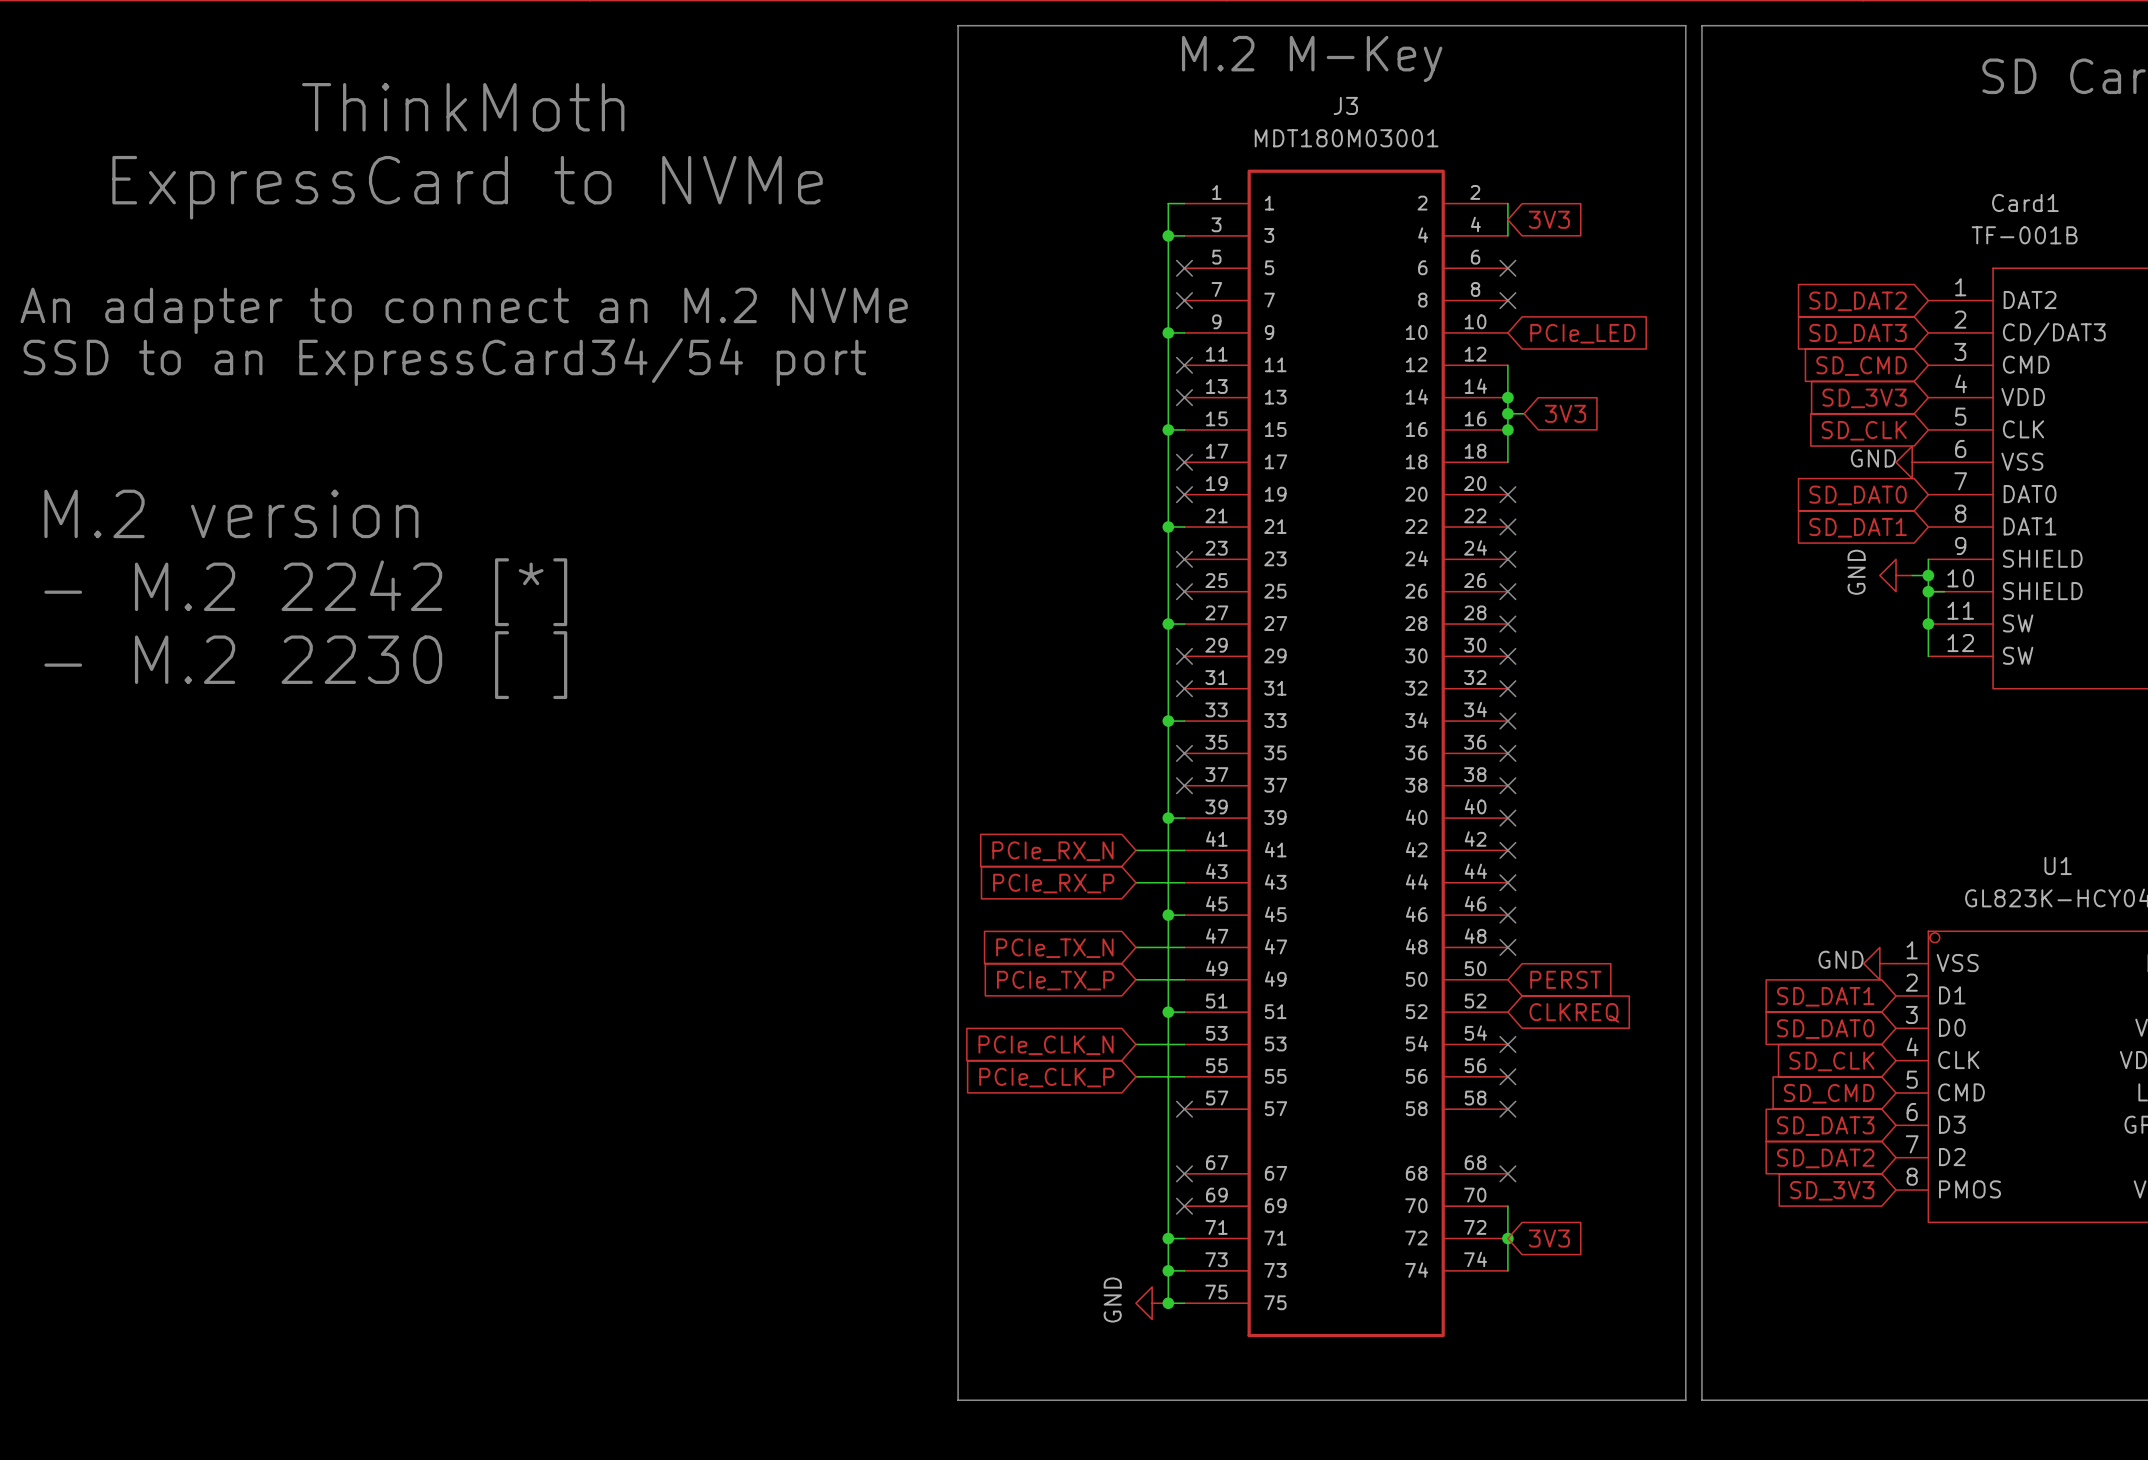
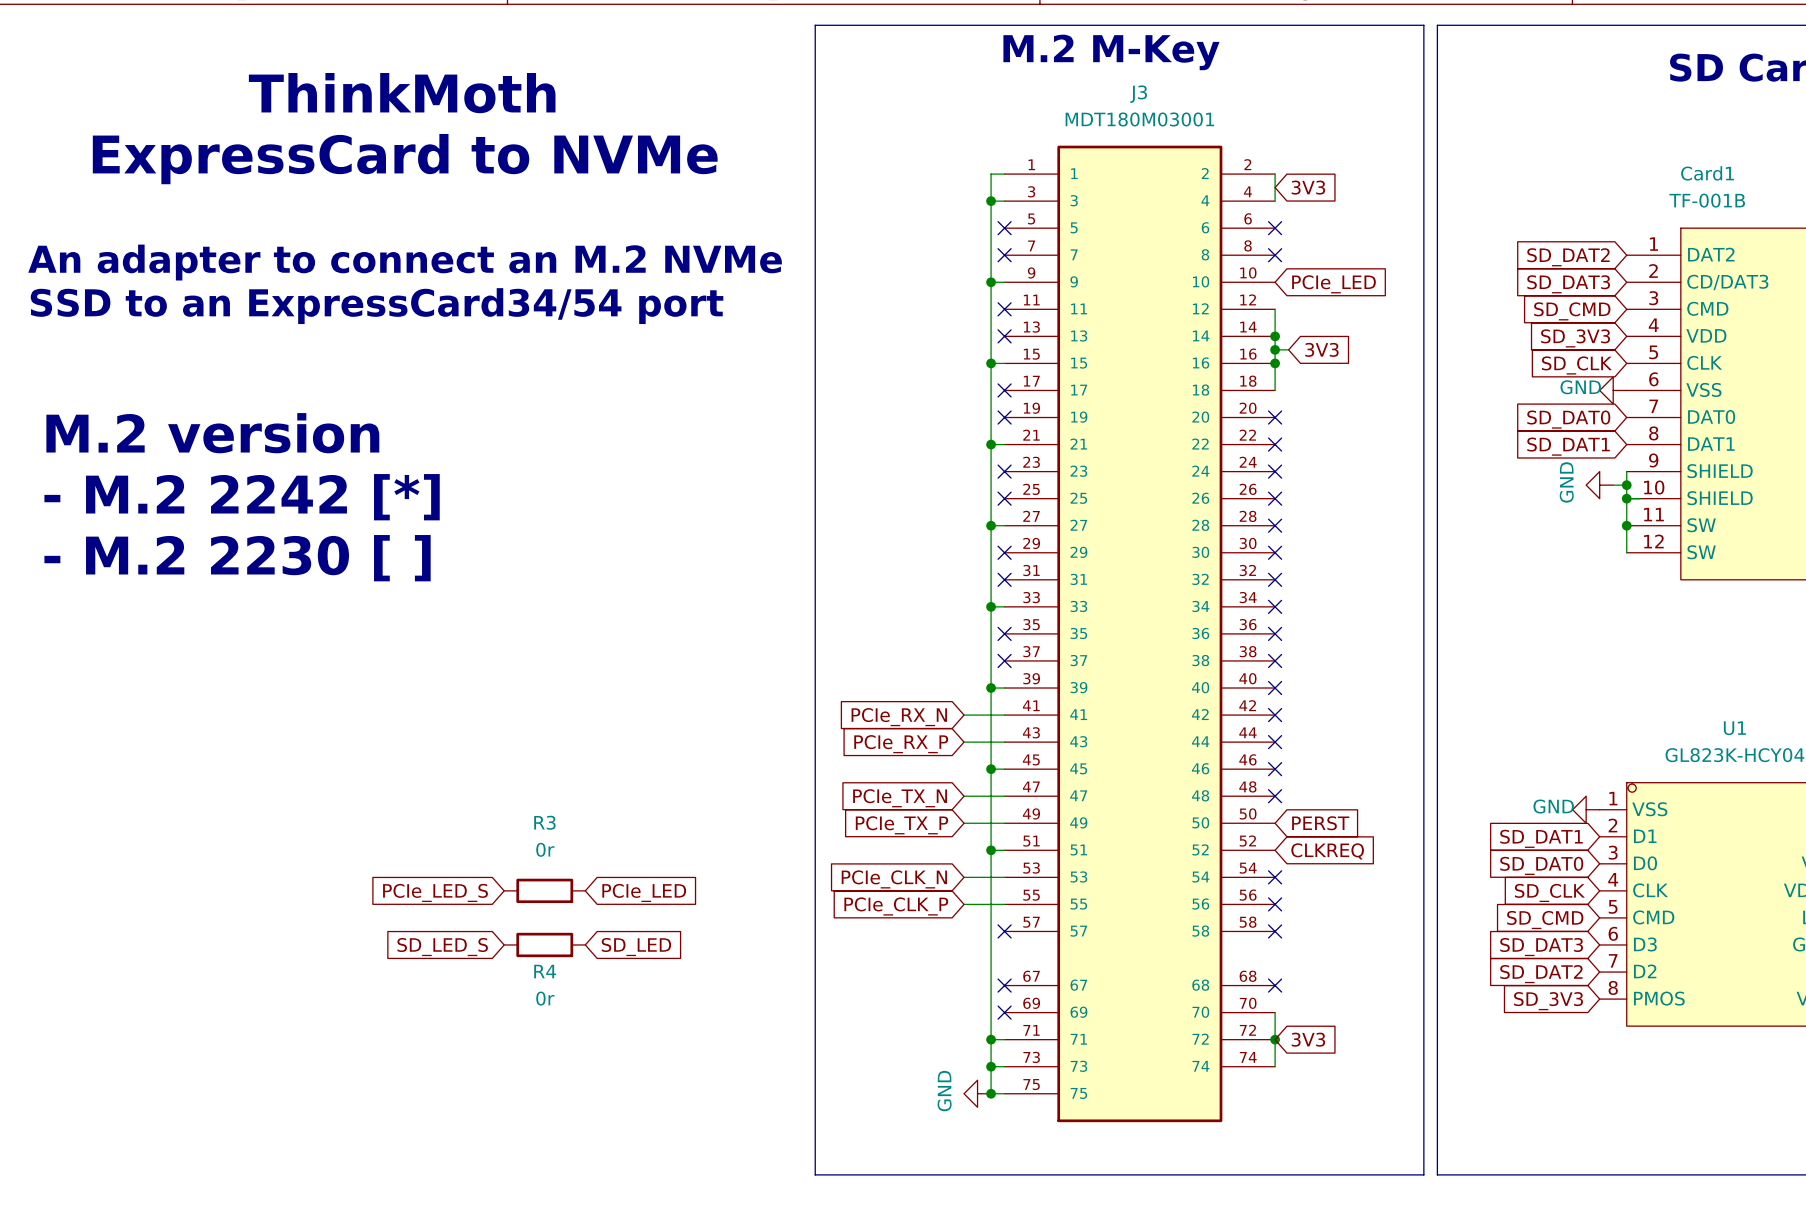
R3: none -> 0r (544, 890)
global label: none -> PCIe_LED_S (435, 892)
global label: none -> PCIe_LED (644, 892)
R4: none -> 0r (544, 944)
global label: none -> SD_LED_S (442, 947)
global label: none -> SD_LED (636, 947)

